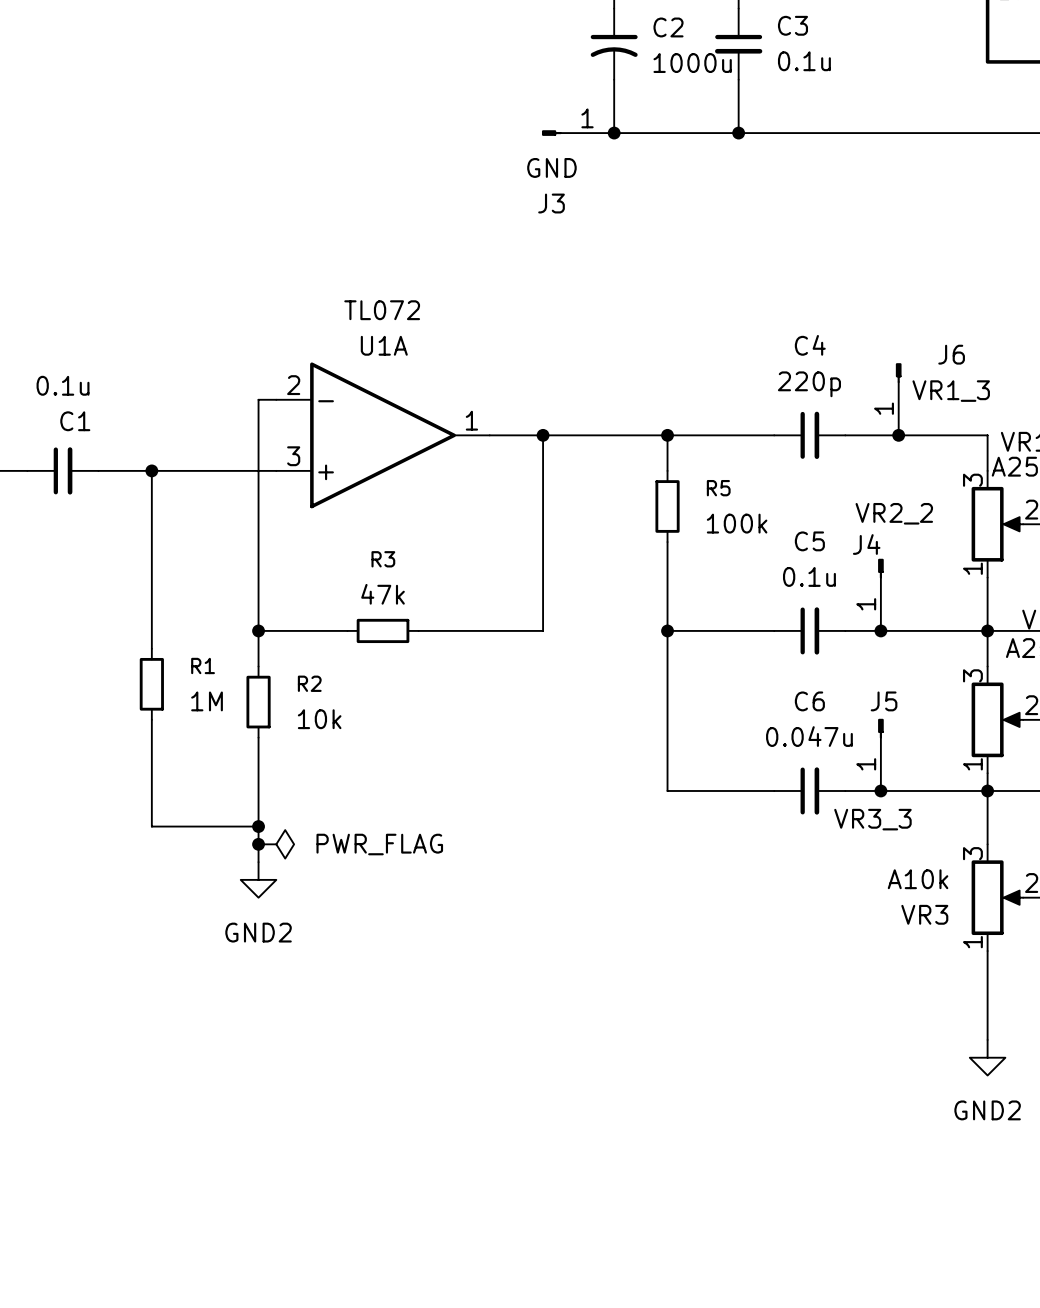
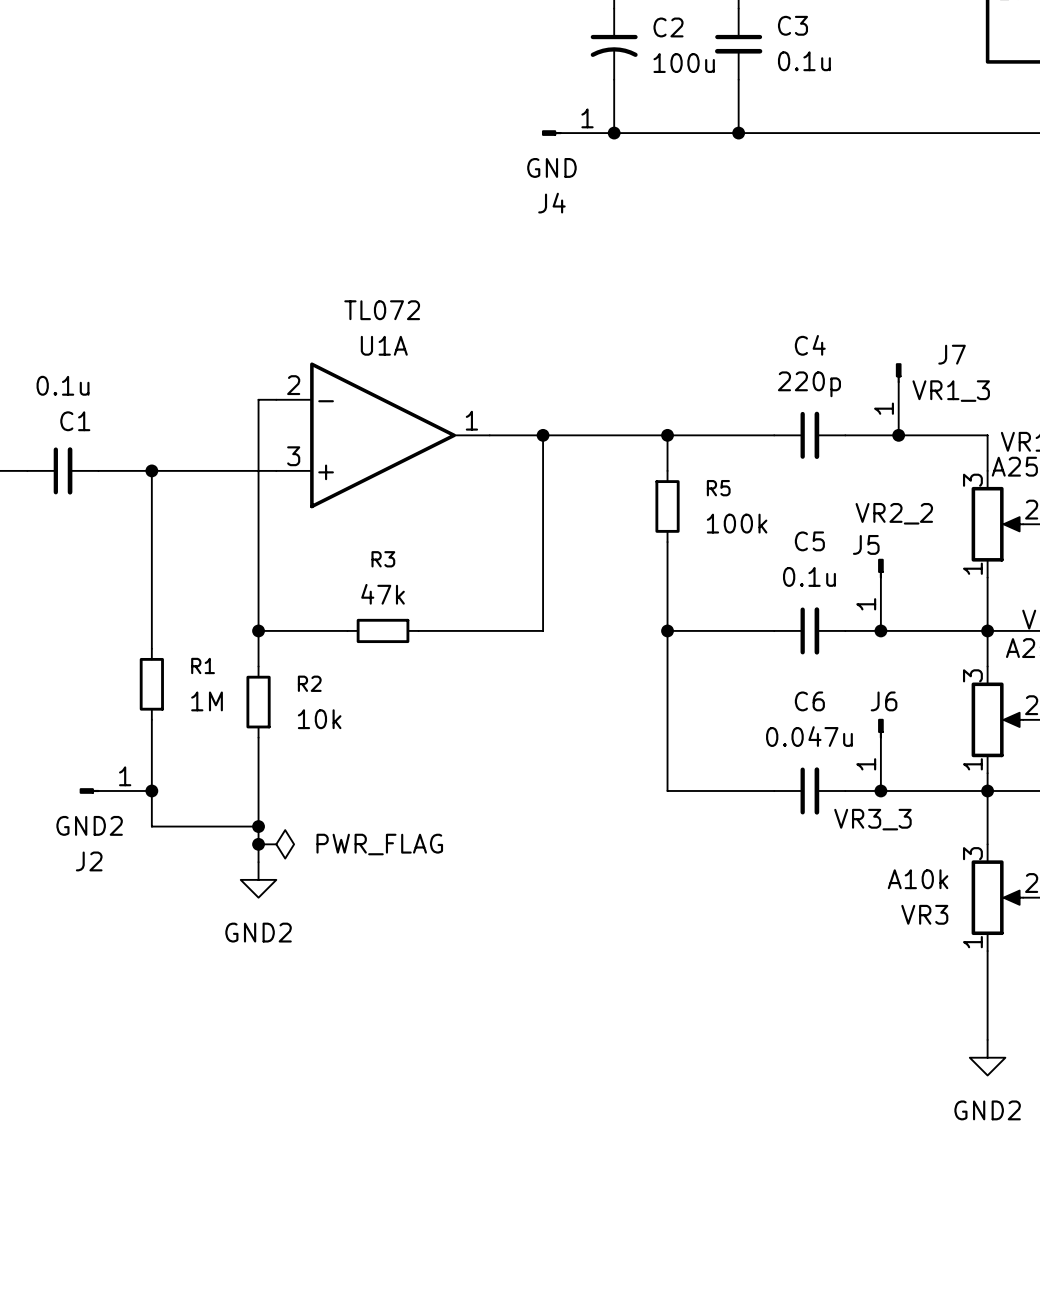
C2 value: 1000u (692, 63) -> 100u (684, 63)
J3 name: J3 (551, 203) -> J4 (551, 203)
J6 name: J6 (951, 354) -> J7 (952, 354)
J4 name: J4 (866, 544) -> J5 (866, 544)
J5 name: J5 (884, 701) -> J6 (884, 701)
J2: none -> GND2 (115, 790)
junction: none -> (151, 790)

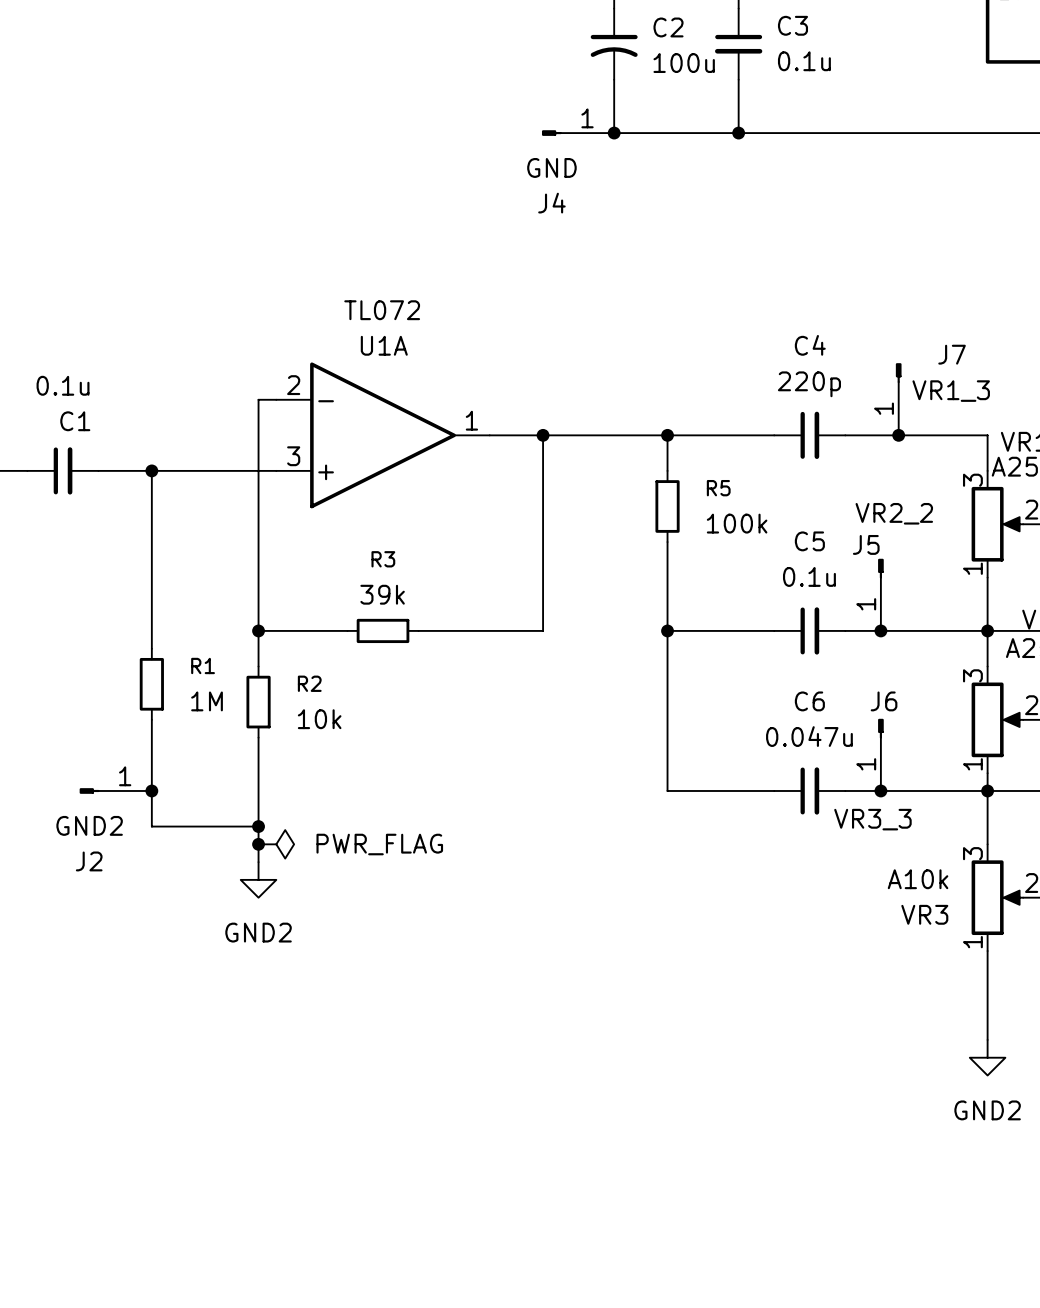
R3 value: 47k (383, 594) -> 39k (382, 594)

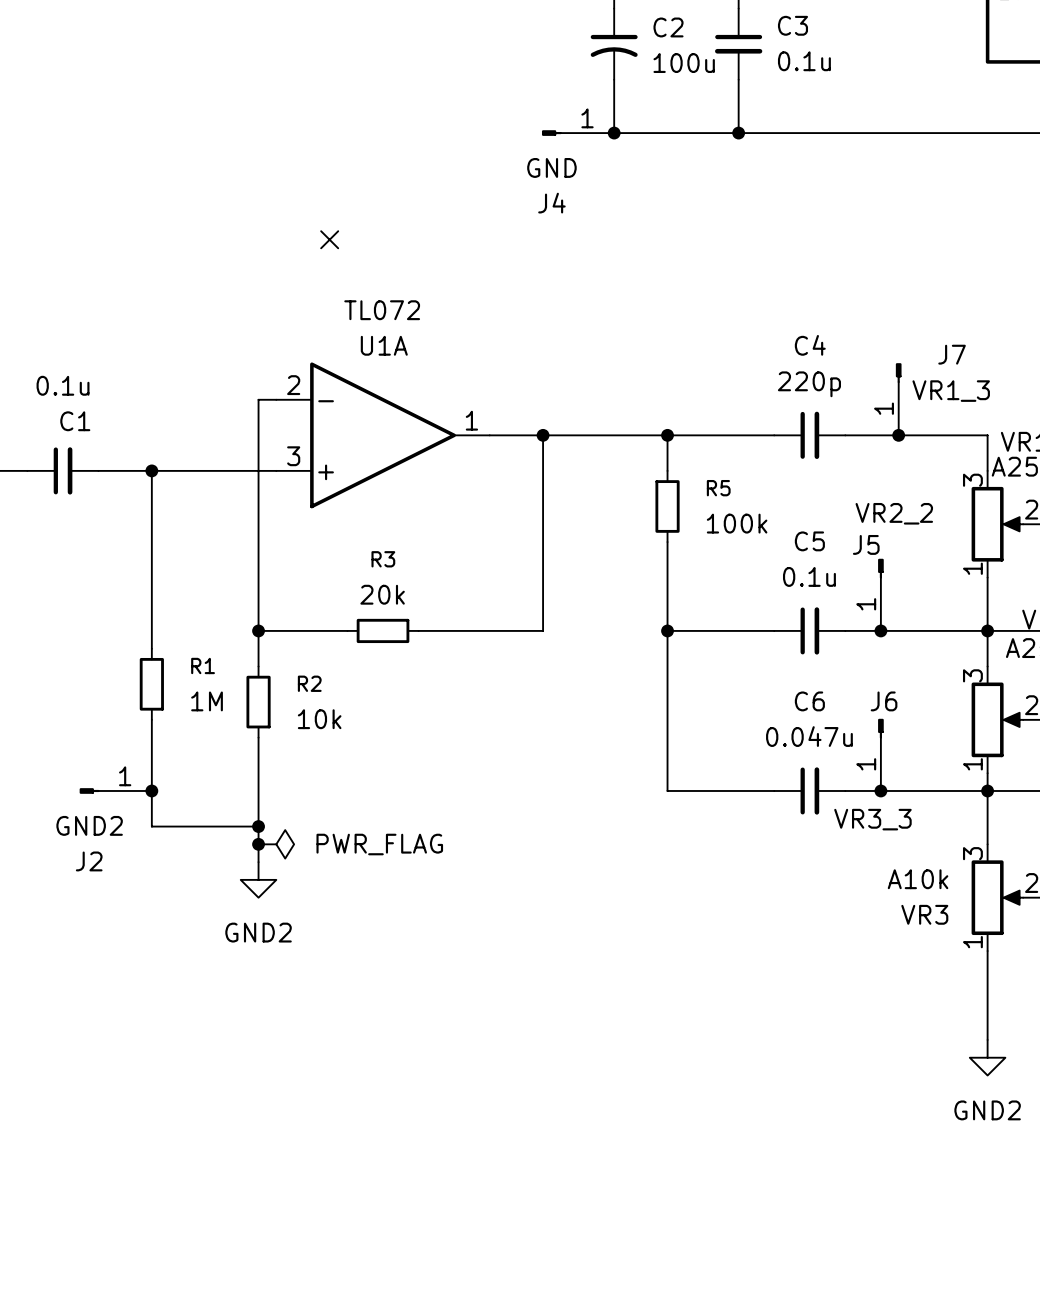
no-connect mark: none -> (329, 239)
R3 value: 39k (382, 594) -> 20k (382, 594)

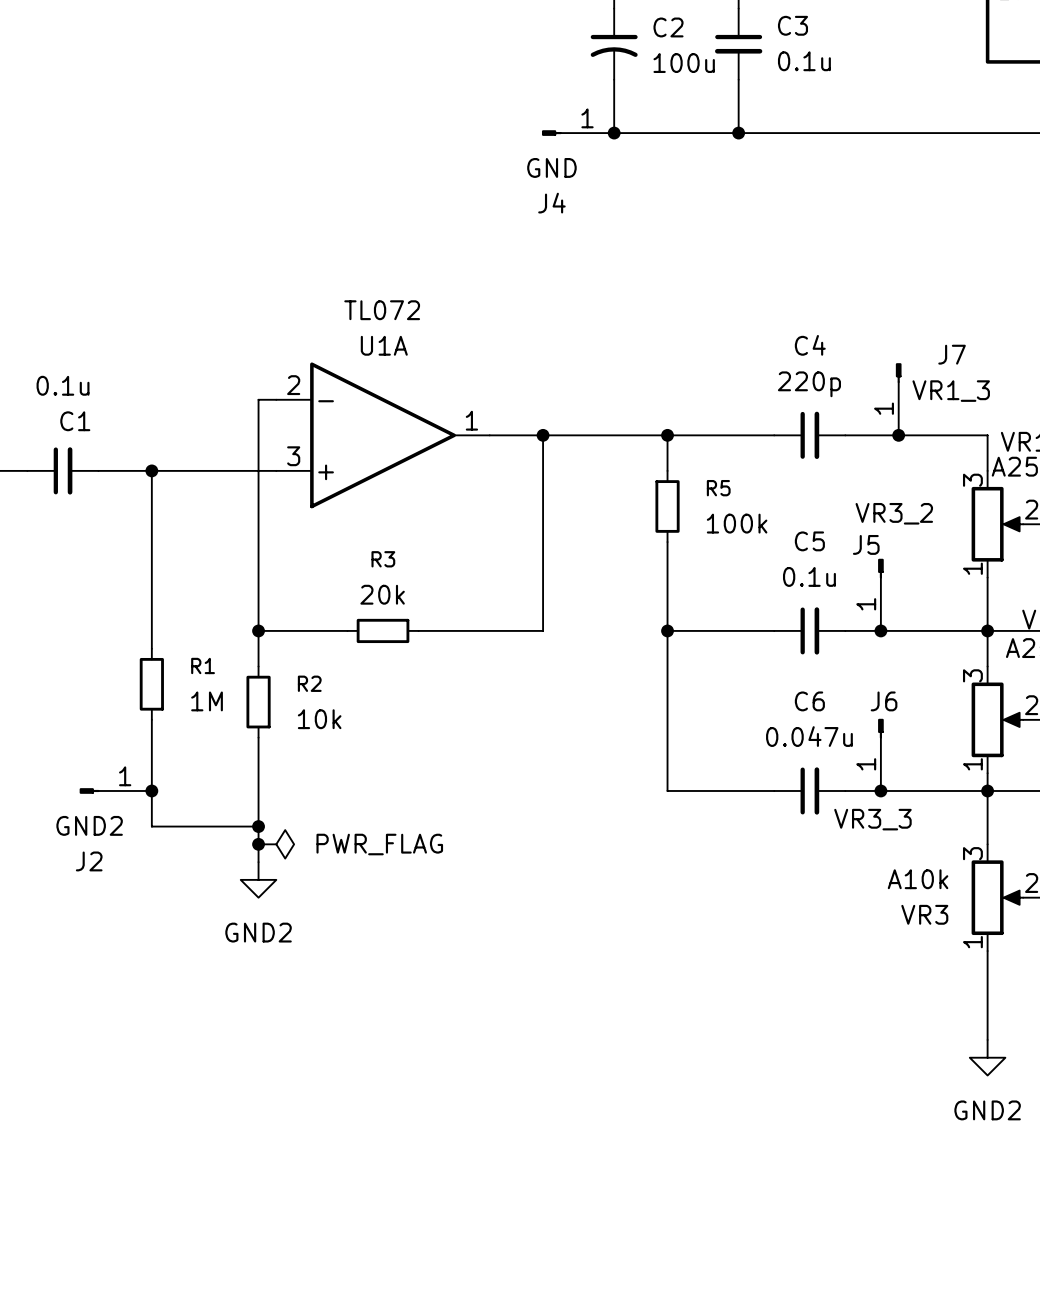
no-connect mark: (329, 239) -> none
J5 value: VR2_2 (894, 513) -> VR3_2 (894, 513)

